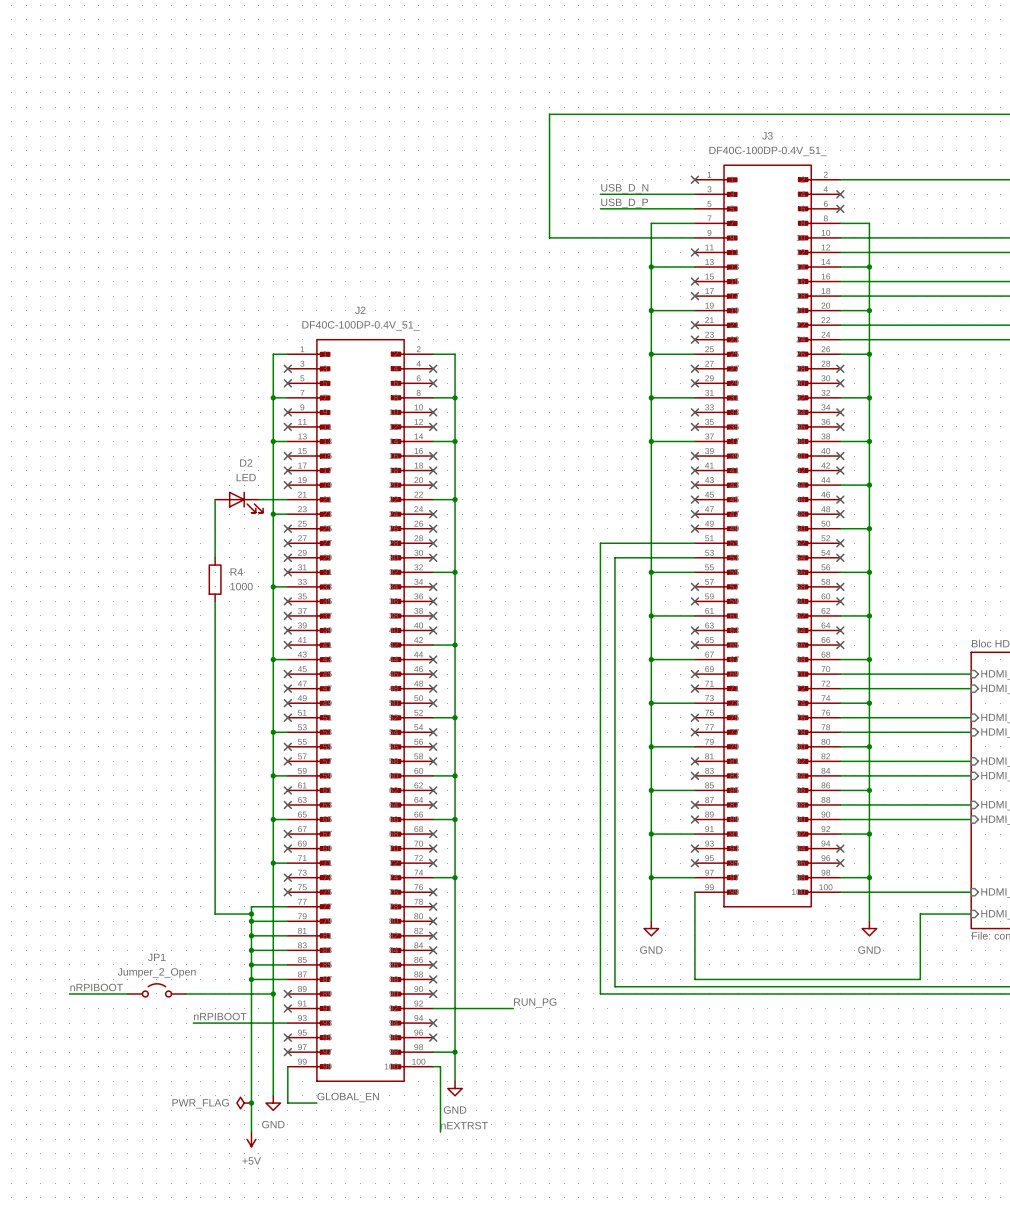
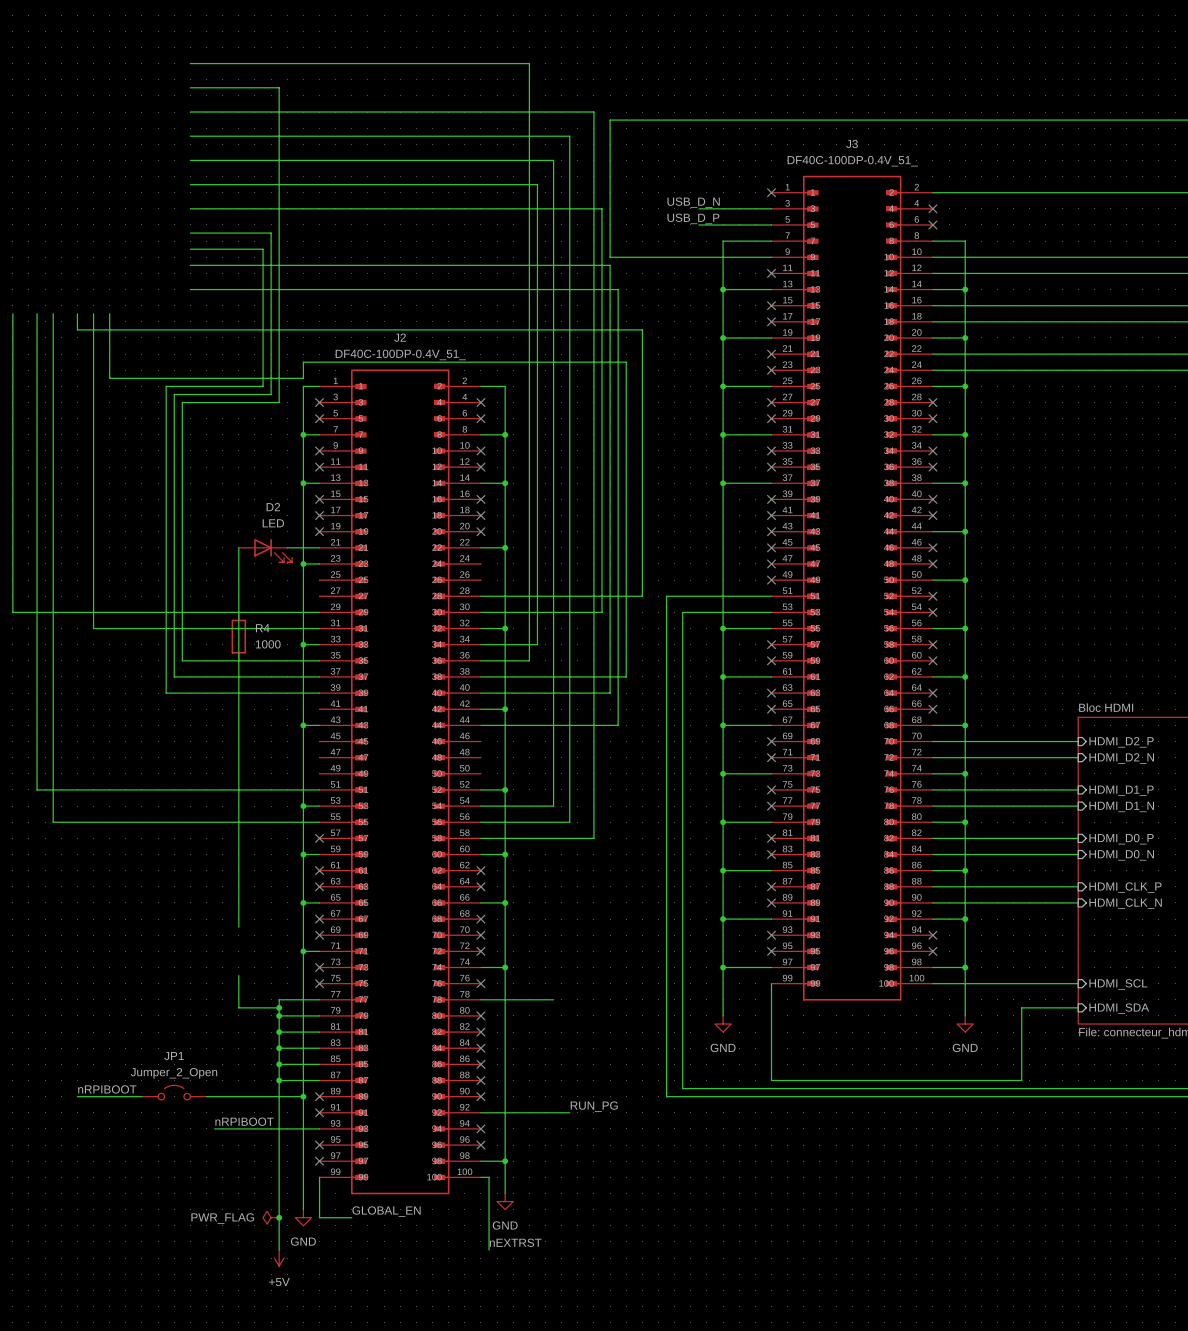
wire: none -> (190, 63) (529, 63) (529, 660) (480, 660)
wire: none -> (190, 87) (279, 87) (279, 402) (182, 402) (182, 660) (319, 660)
wire: none -> (190, 112) (593, 112) (593, 838) (480, 838)
wire: none -> (190, 136) (569, 136) (569, 822) (480, 822)
wire: none -> (190, 160) (553, 160) (553, 806) (480, 806)
wire: none -> (190, 184) (537, 184) (537, 644) (480, 644)
wire: none -> (190, 208) (602, 208) (602, 612) (480, 612)
wire: (600, 194) (629, 194) -> none
wire: (600, 208) (629, 208) -> none
wire: none -> (190, 233) (271, 233) (271, 394) (174, 394) (174, 676) (319, 676)
wire: none -> (190, 249) (263, 249) (263, 386) (166, 386) (166, 693) (319, 693)
wire: none -> (190, 265) (610, 265) (610, 693) (480, 693)
wire: none -> (190, 289) (618, 289) (618, 725) (480, 725)
wire: none -> (12, 313) (12, 612) (319, 612)
wire: none -> (37, 313) (37, 789) (319, 789)
wire: none -> (53, 313) (53, 822) (319, 822)
wire: none -> (77, 313) (77, 329) (642, 329) (642, 596) (480, 596)
wire: none -> (93, 313) (93, 628) (319, 628)
wire: none -> (109, 313) (109, 378) (303, 378) (303, 362) (626, 362) (626, 676) (480, 676)
no-connect mark: (433, 514) -> none
no-connect mark: (287, 528) -> none
no-connect mark: (433, 528) -> none
no-connect mark: (287, 543) -> none
no-connect mark: (433, 543) -> none
wire: none -> (238, 612) (238, 660)
no-connect mark: (287, 557) -> none
no-connect mark: (433, 557) -> none
no-connect mark: (287, 572) -> none
no-connect mark: (433, 586) -> none
no-connect mark: (287, 601) -> none
no-connect mark: (433, 601) -> none
no-connect mark: (287, 615) -> none
no-connect mark: (433, 615) -> none
no-connect mark: (287, 630) -> none
no-connect mark: (433, 630) -> none
no-connect mark: (287, 645) -> none
no-connect mark: (433, 659) -> none
no-connect mark: (287, 674) -> none
no-connect mark: (433, 674) -> none
no-connect mark: (287, 688) -> none
no-connect mark: (433, 688) -> none
no-connect mark: (287, 703) -> none
no-connect mark: (433, 703) -> none
no-connect mark: (287, 717) -> none
no-connect mark: (433, 732) -> none
no-connect mark: (287, 746) -> none
no-connect mark: (433, 746) -> none
no-connect mark: (433, 761) -> none
wire: (215, 841) (215, 884) -> none
wire: none -> (480, 999) (553, 999)
no-connect mark: (433, 906) -> none

